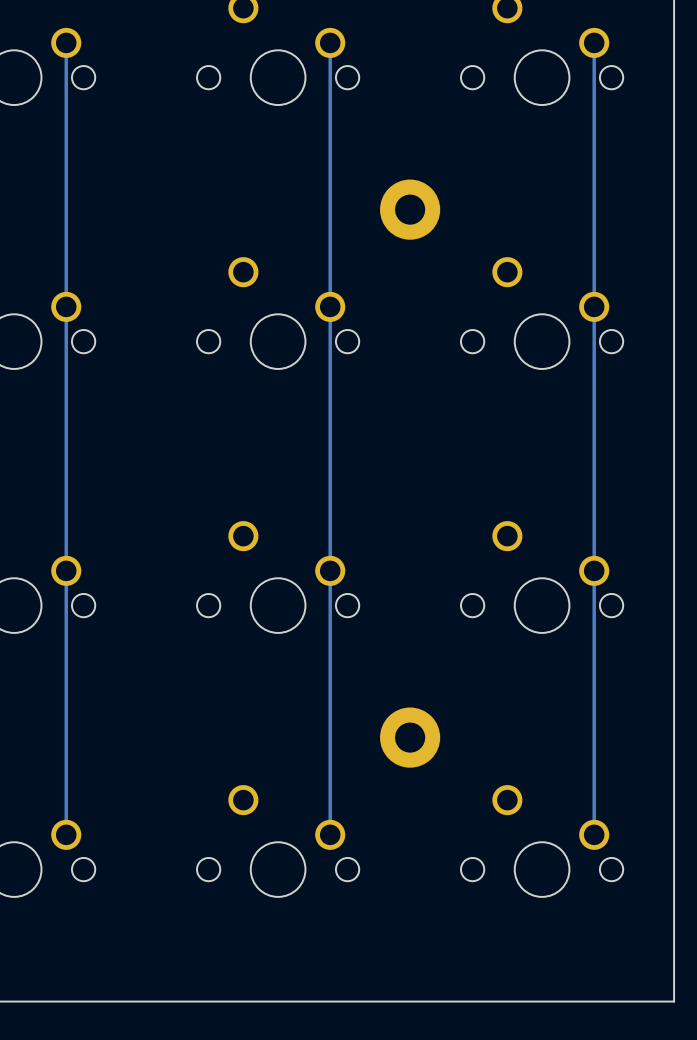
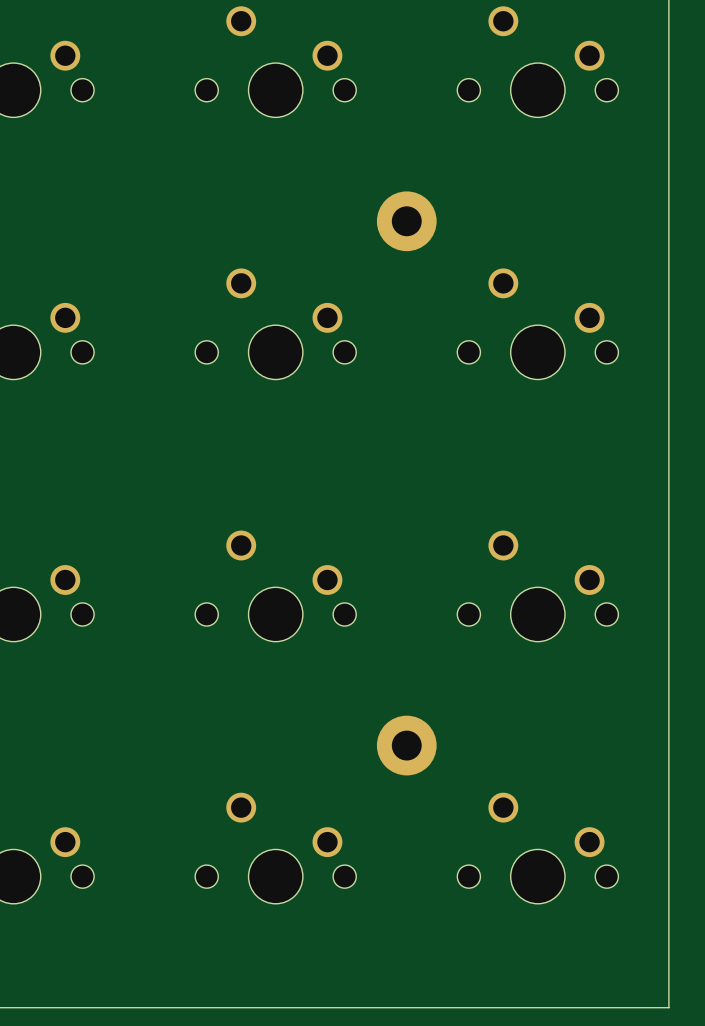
track: (66, 42) (66, 834) -> none
track: (330, 42) (330, 834) -> none
track: (594, 42) (594, 834) -> none

